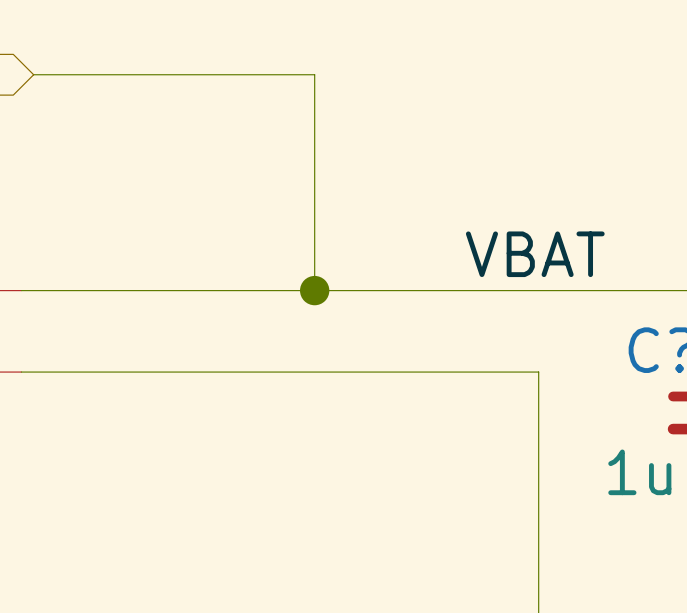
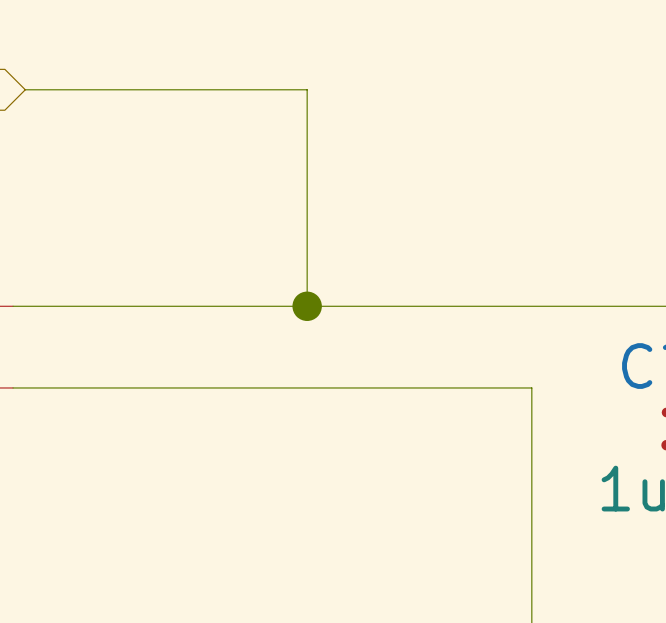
label: VBAT (535, 254) -> none

